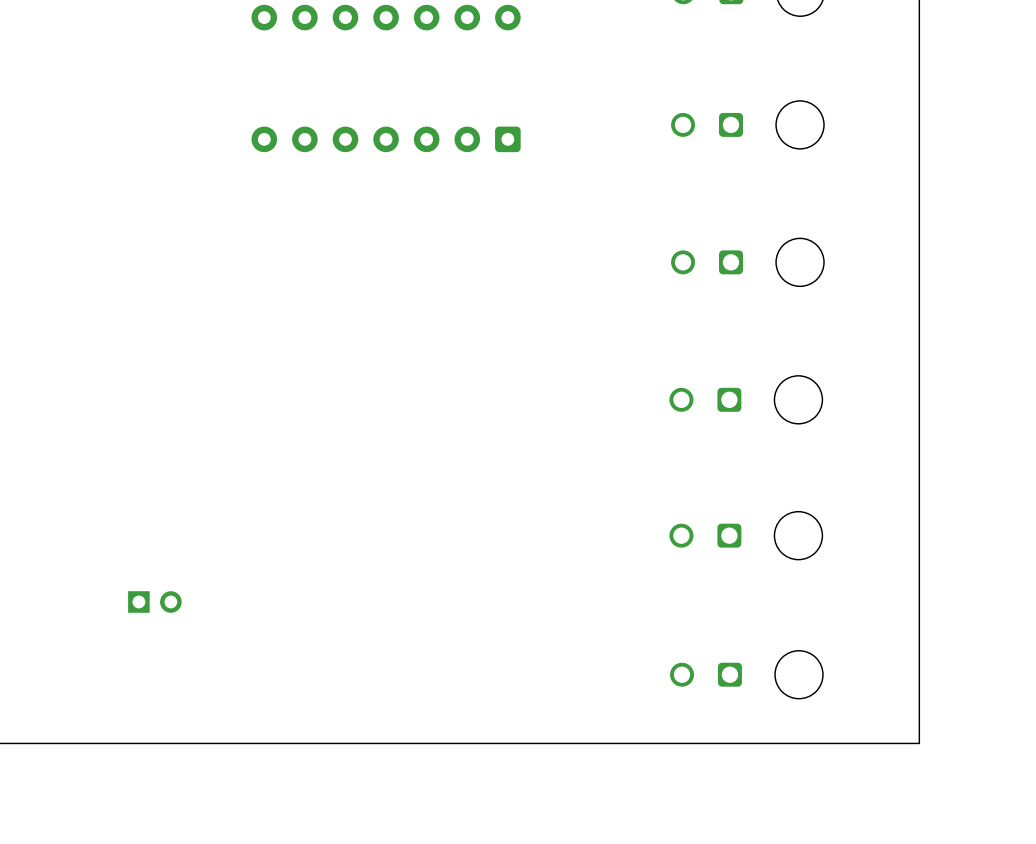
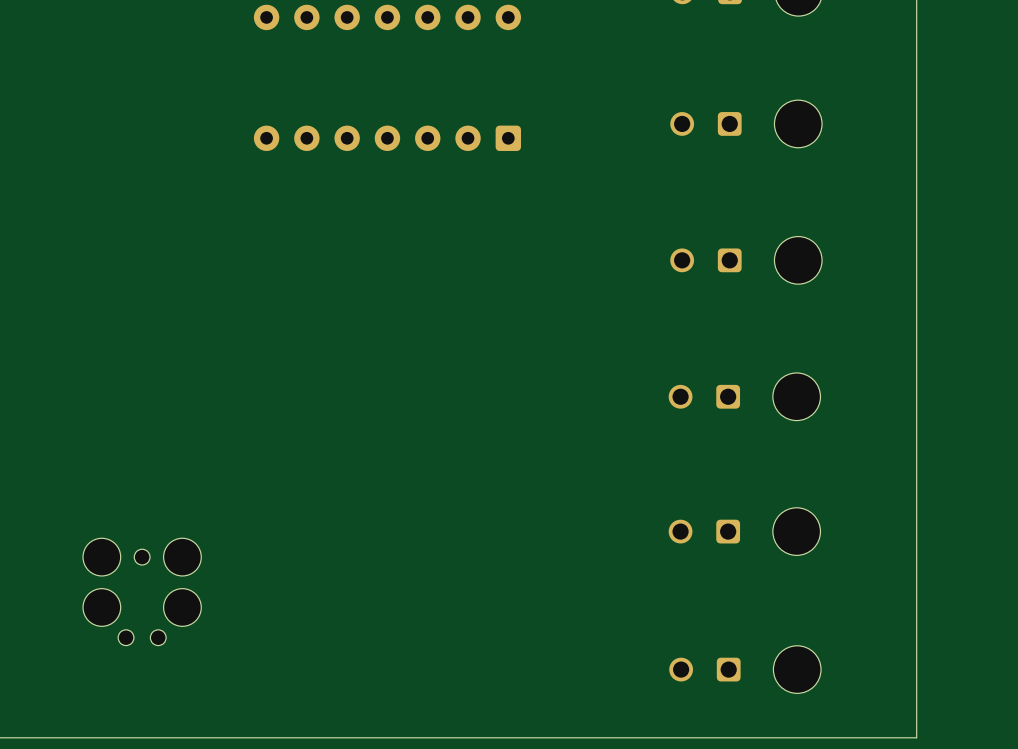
part: none -> (142, 591)
part: (154, 602) -> none

